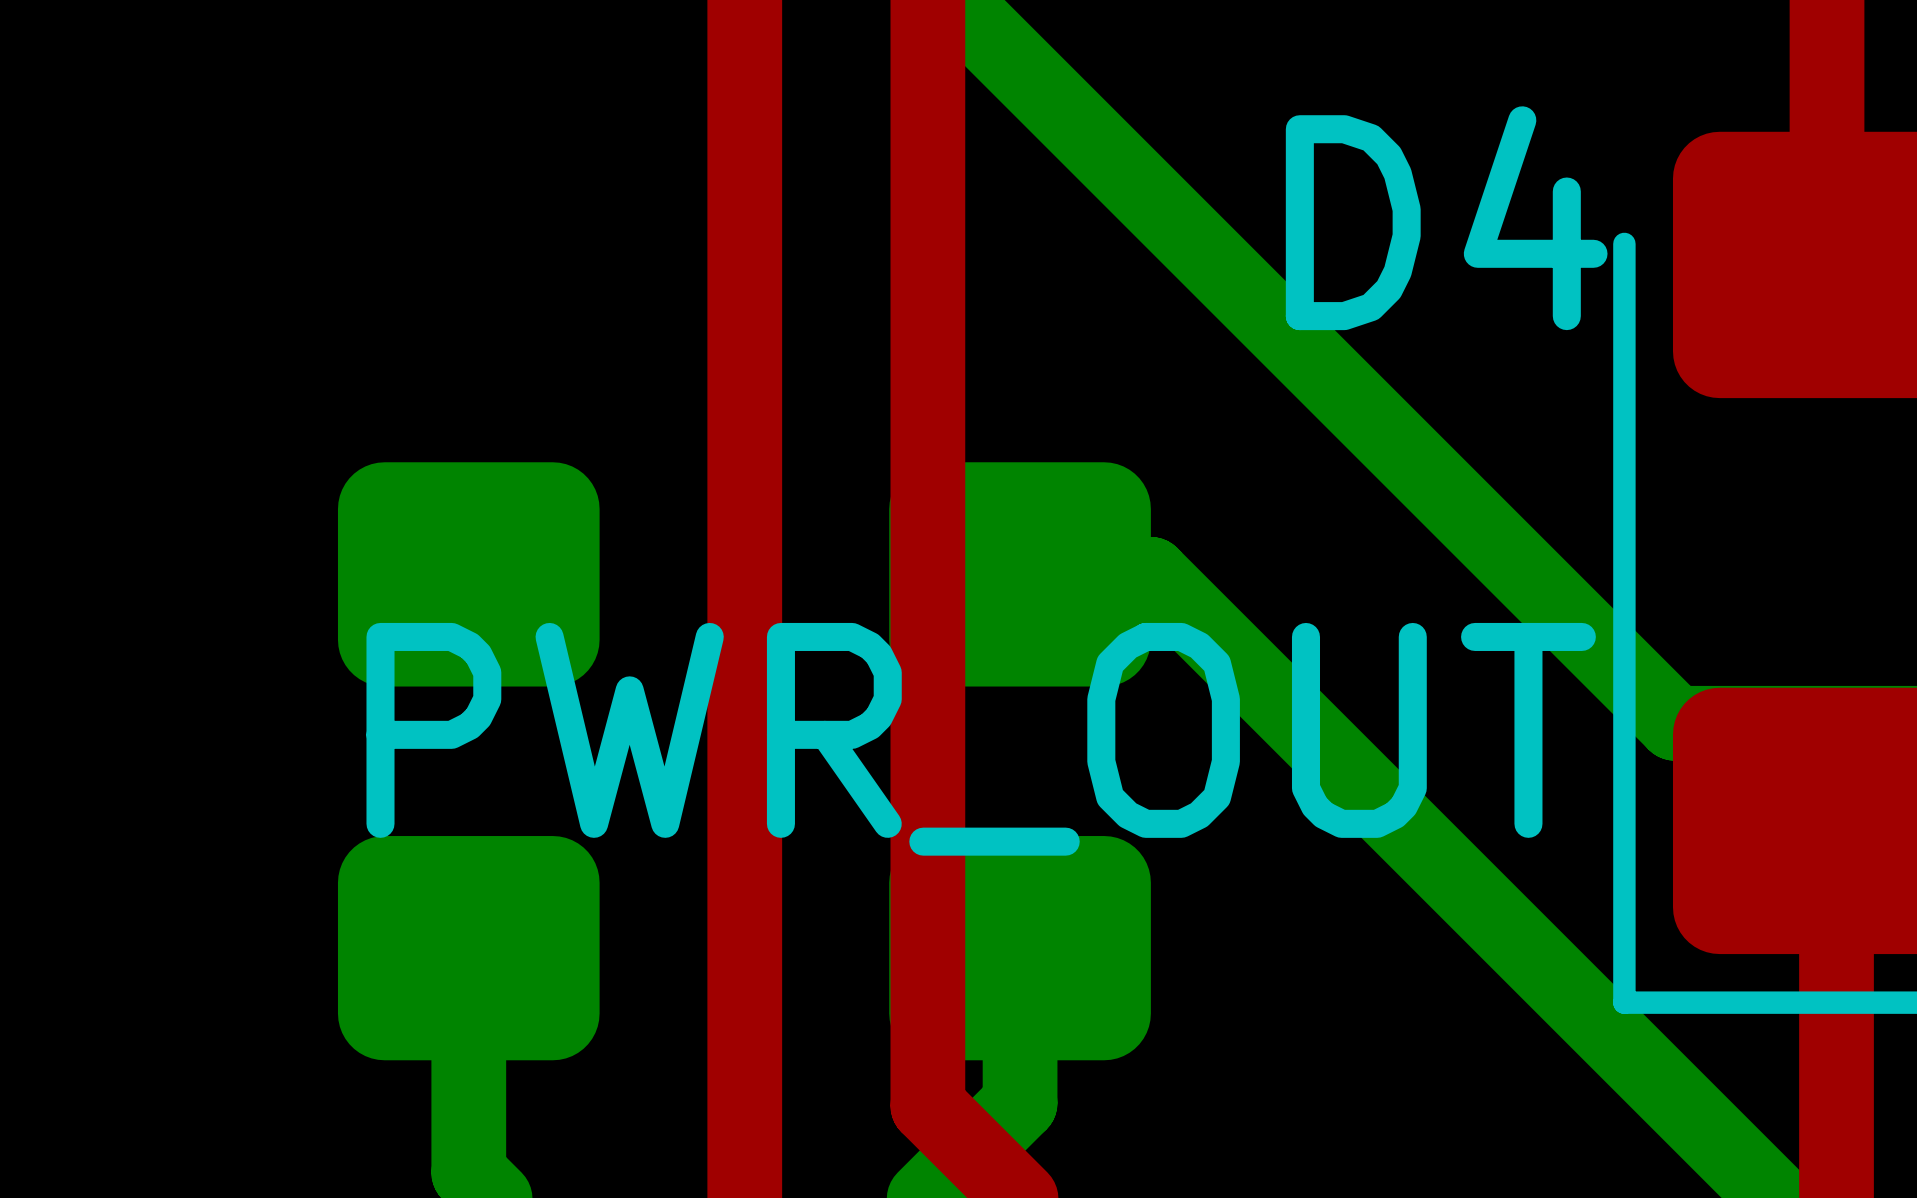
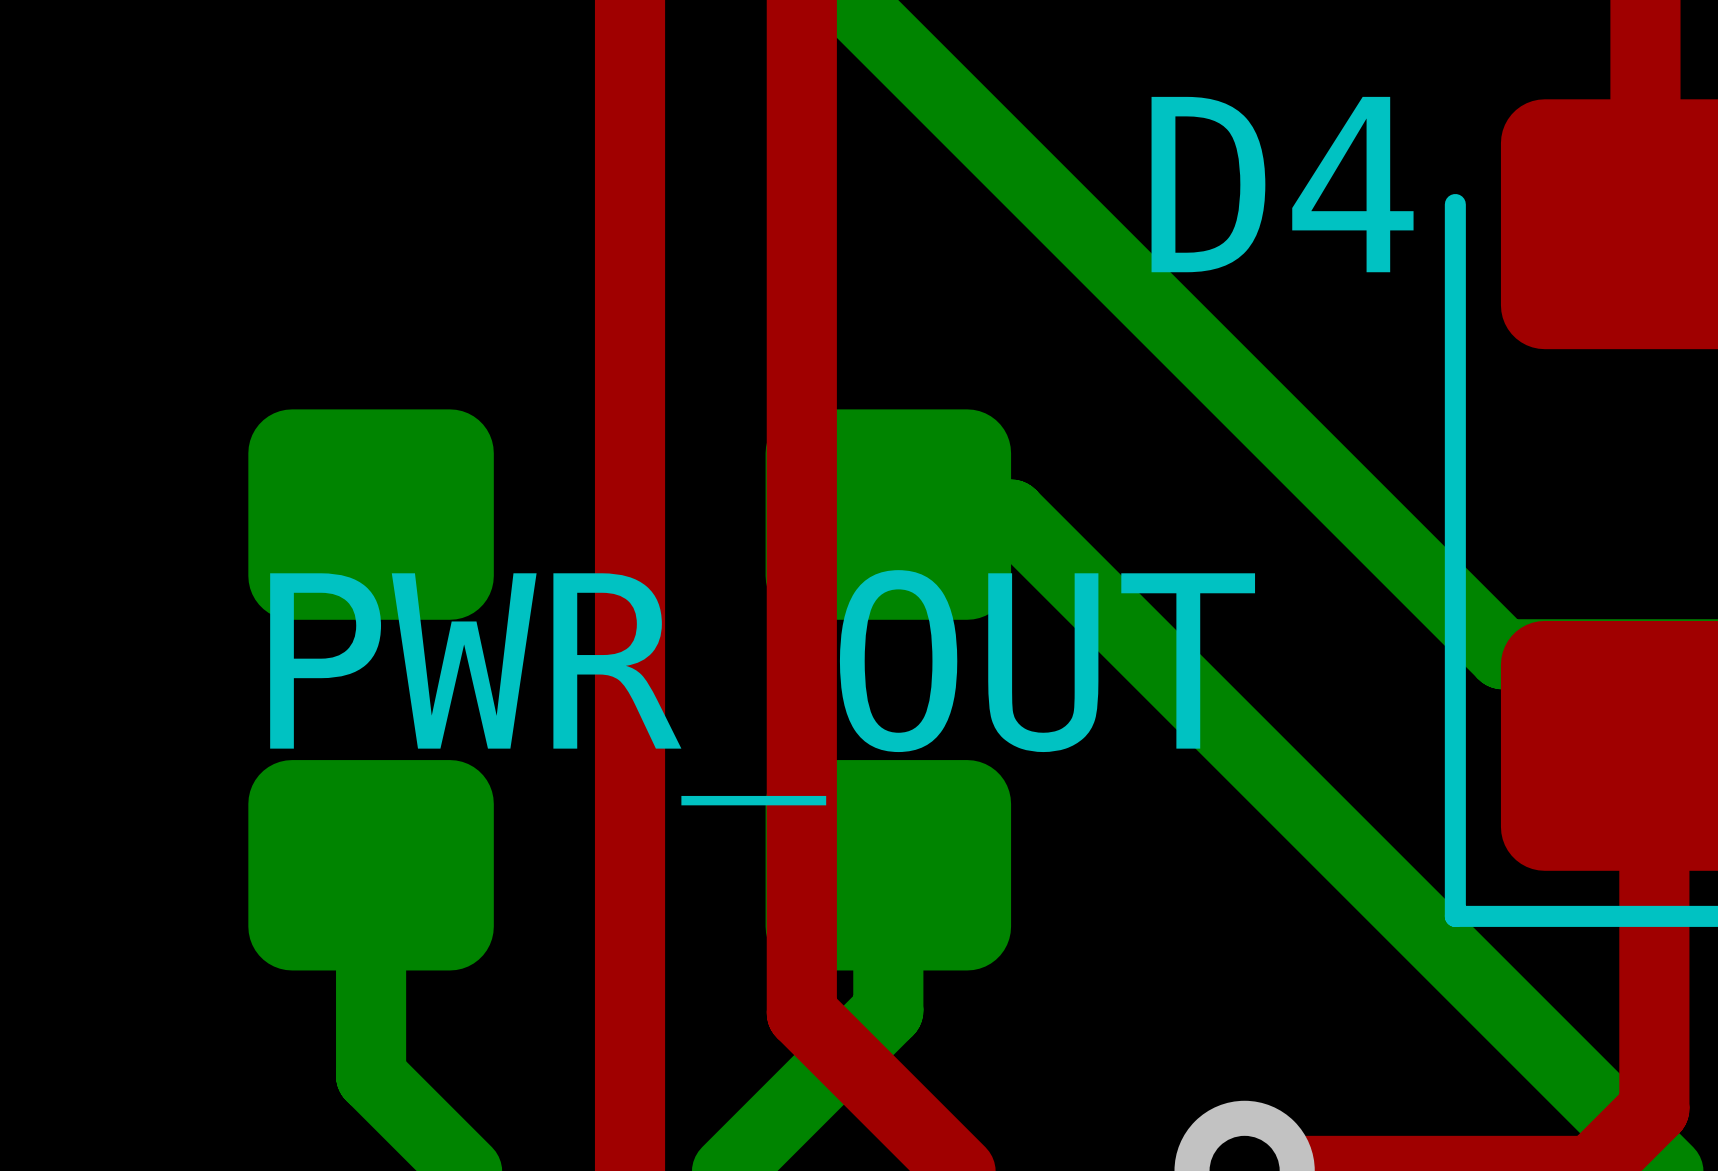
text position: PWR_OUT (981, 739) -> PWR_OUT (762, 687)

